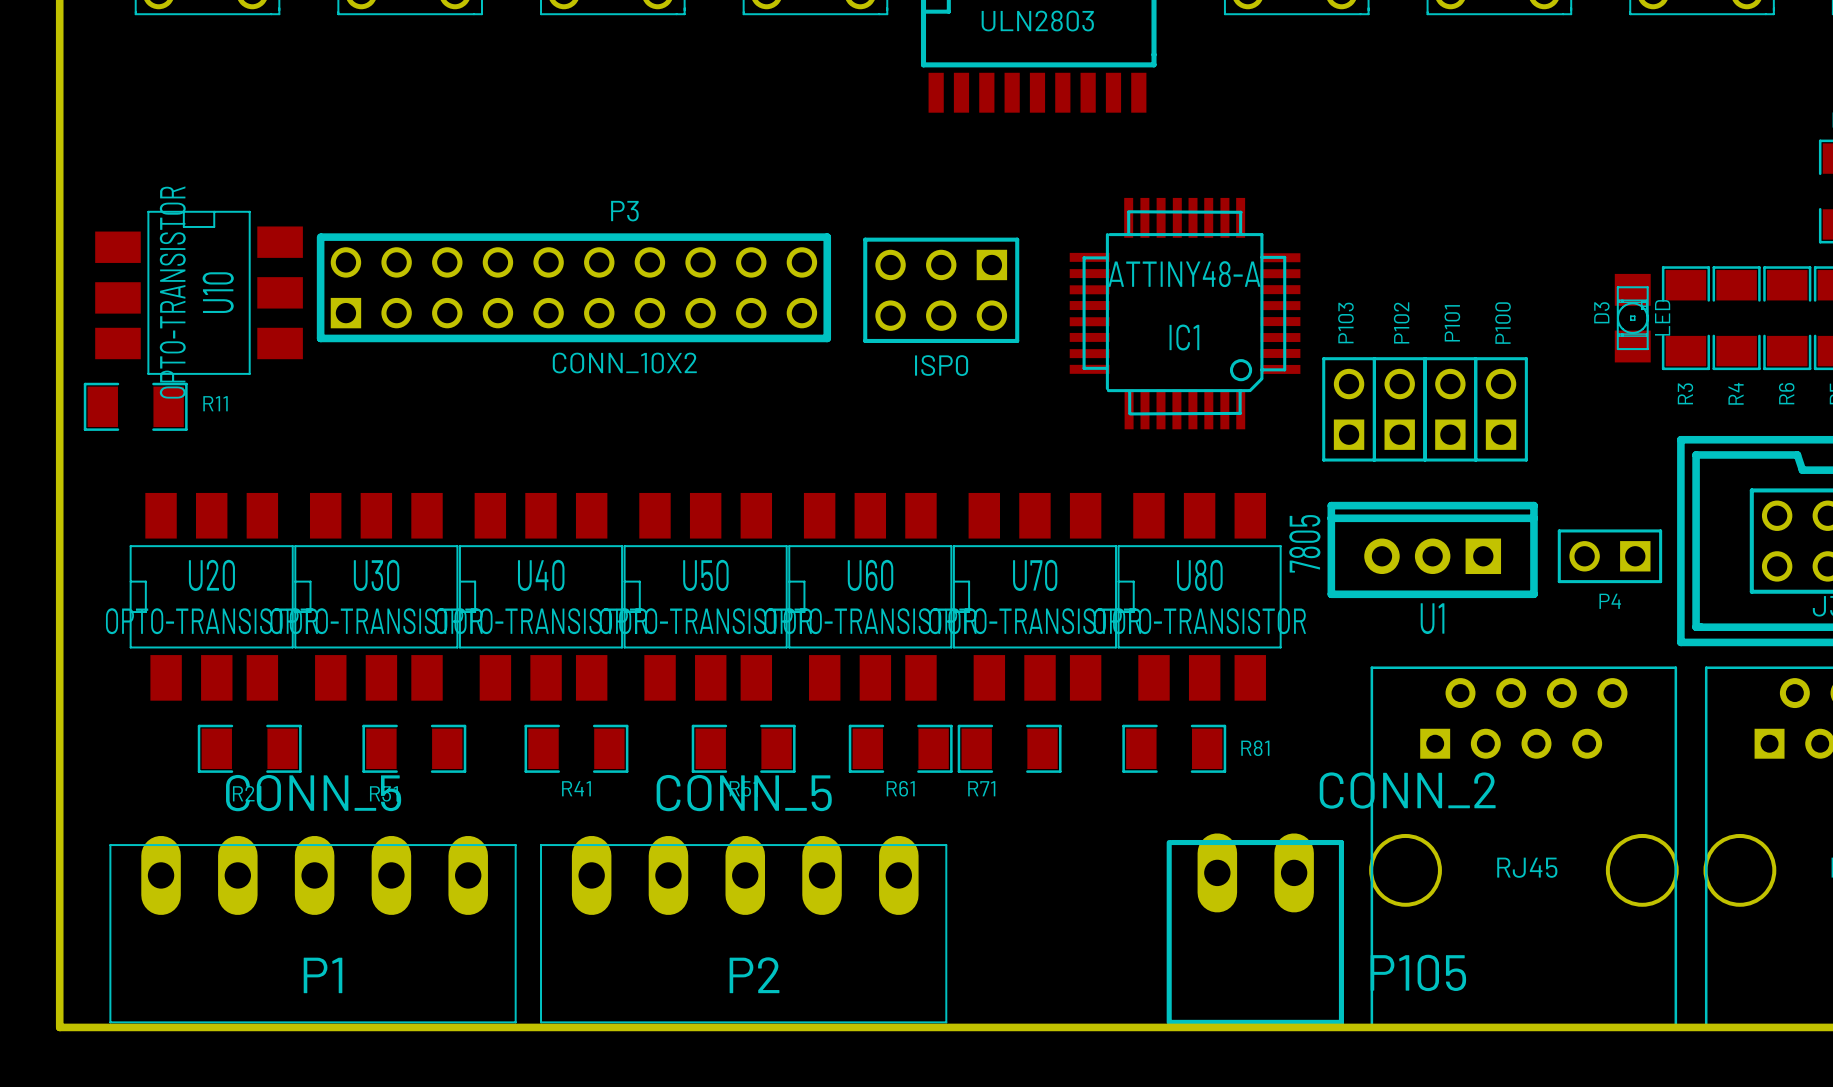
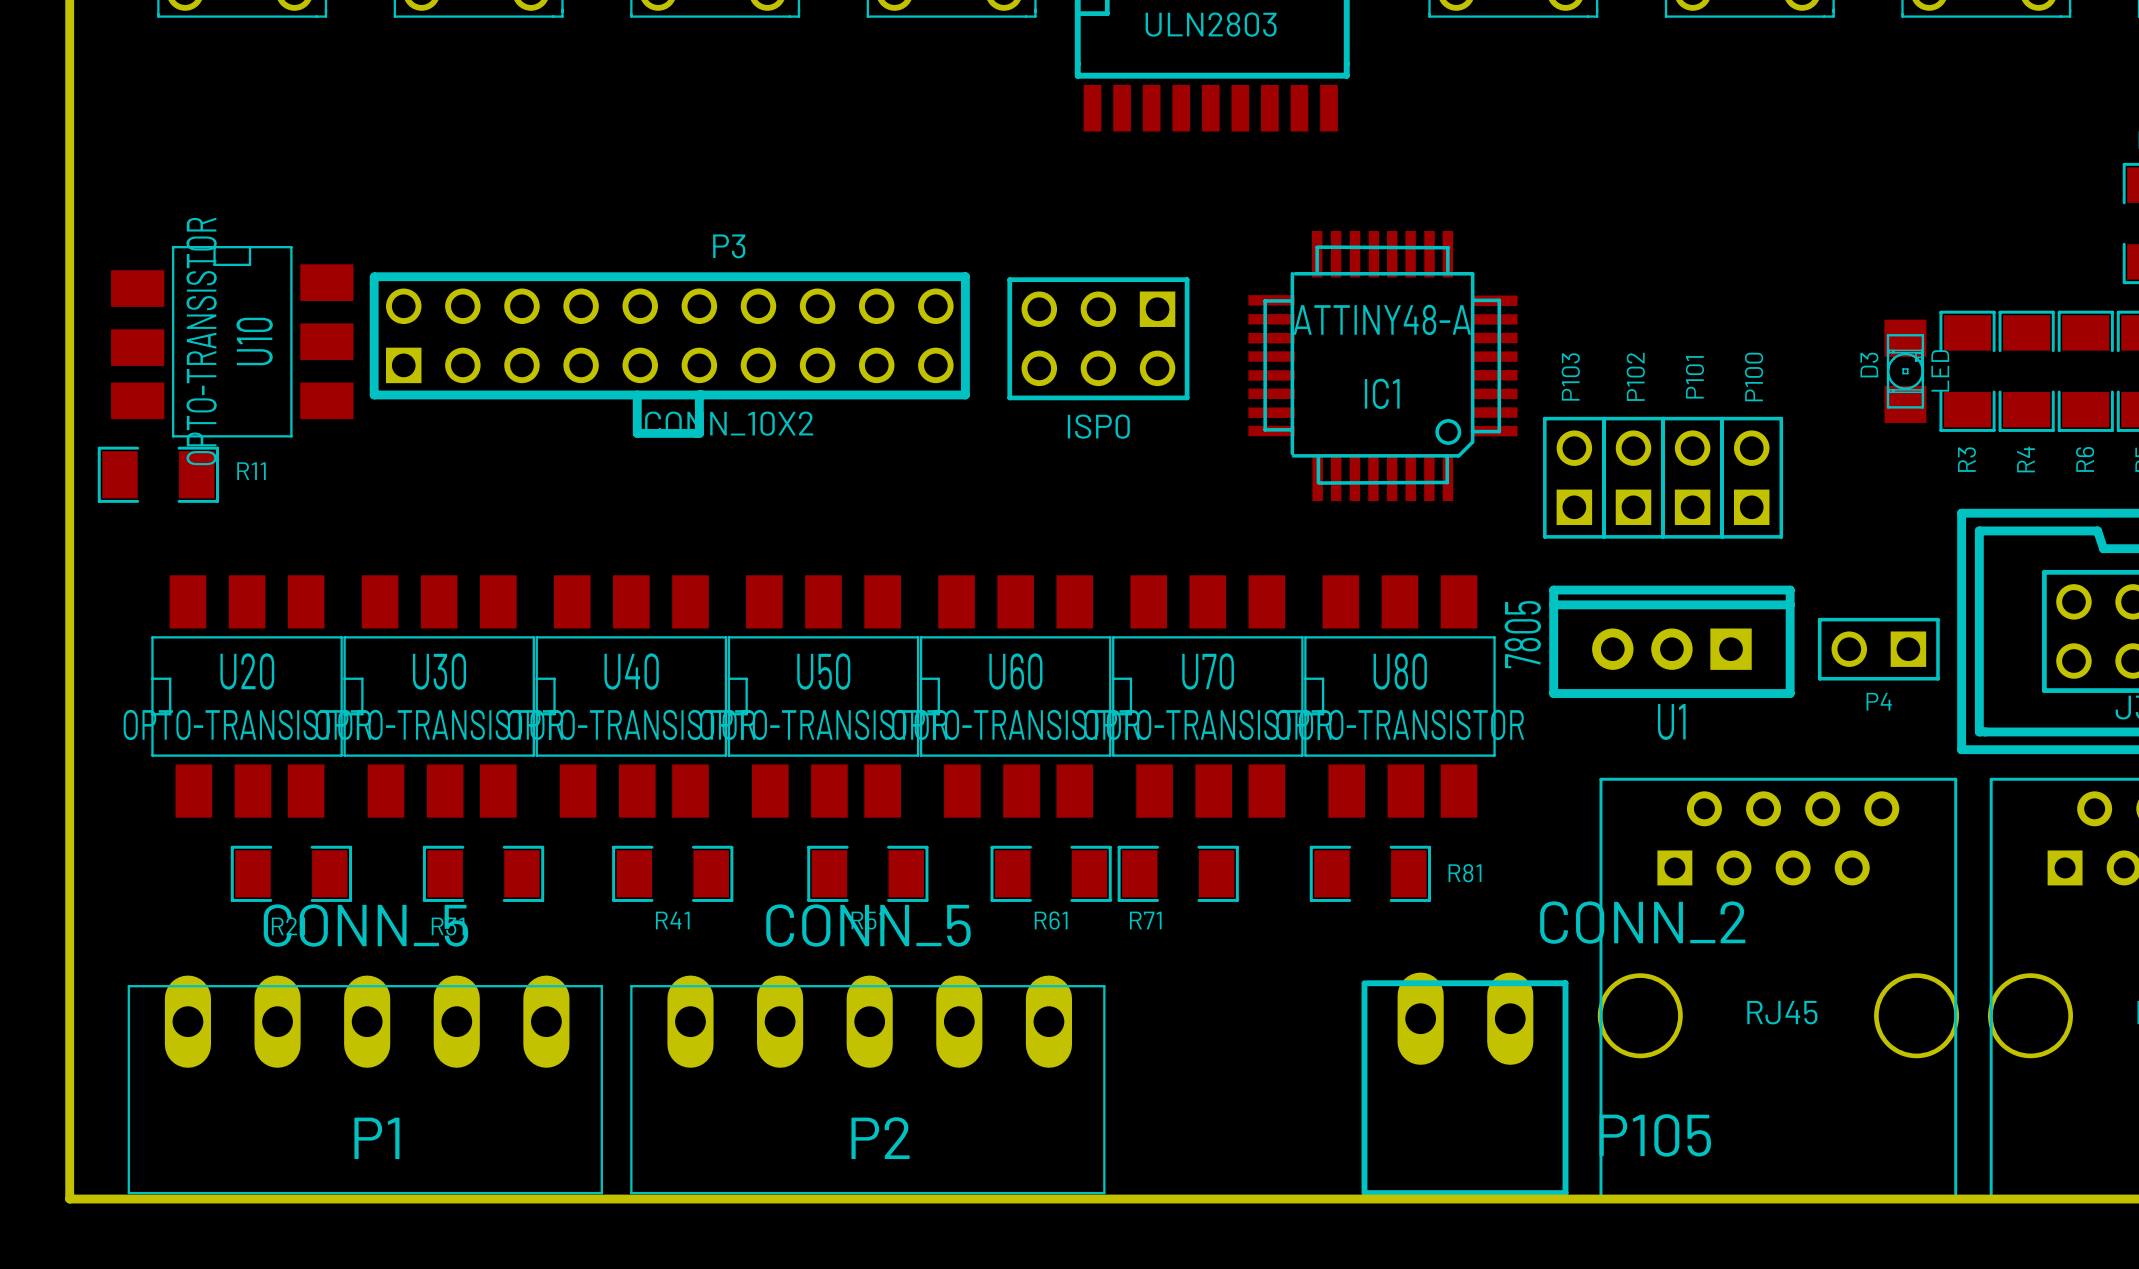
line: none -> (637, 394) (637, 433) (699, 433) (699, 394) (702, 394)

